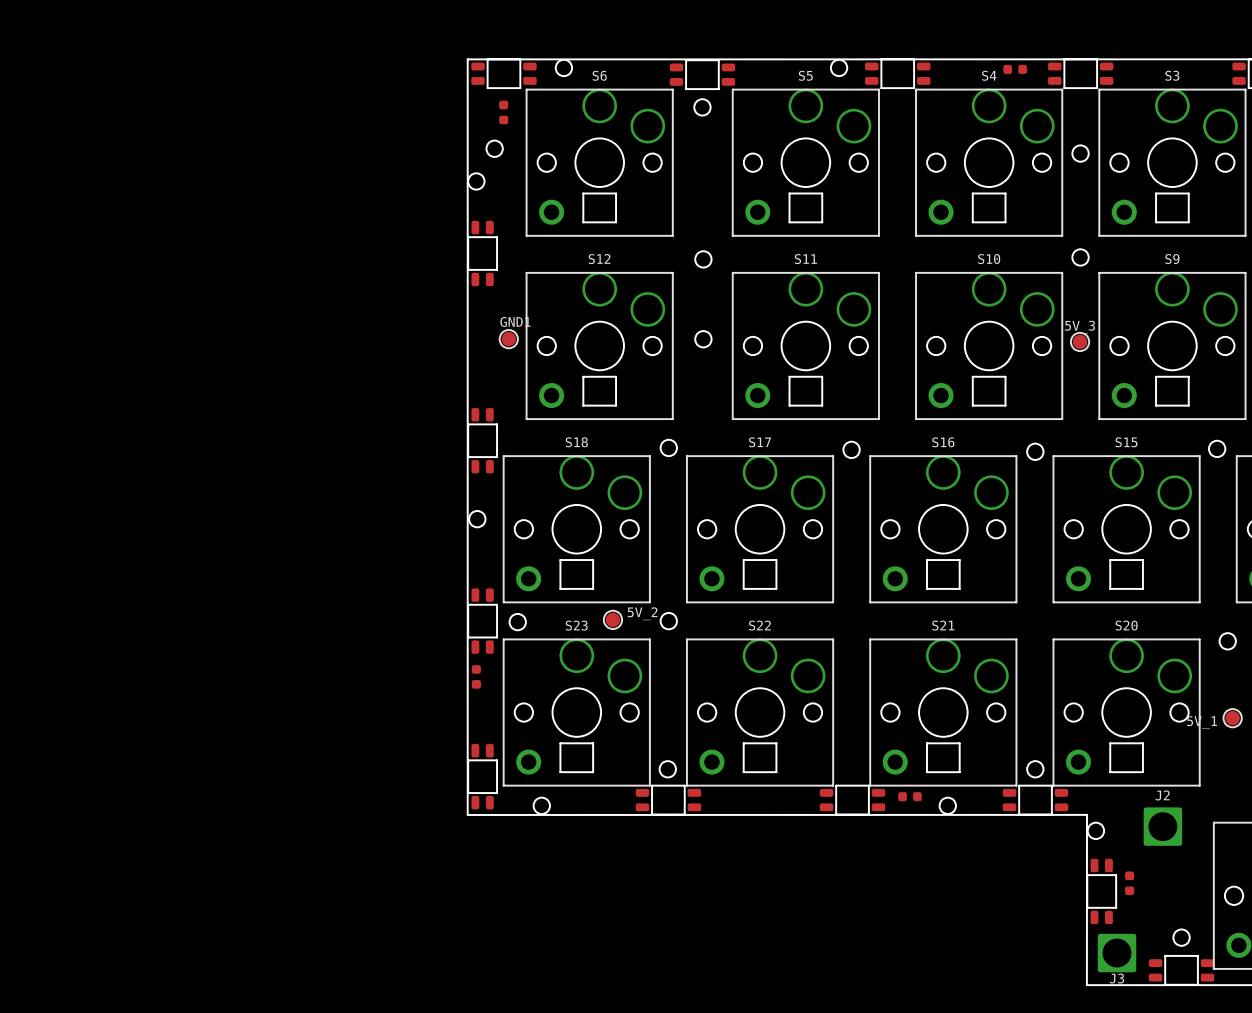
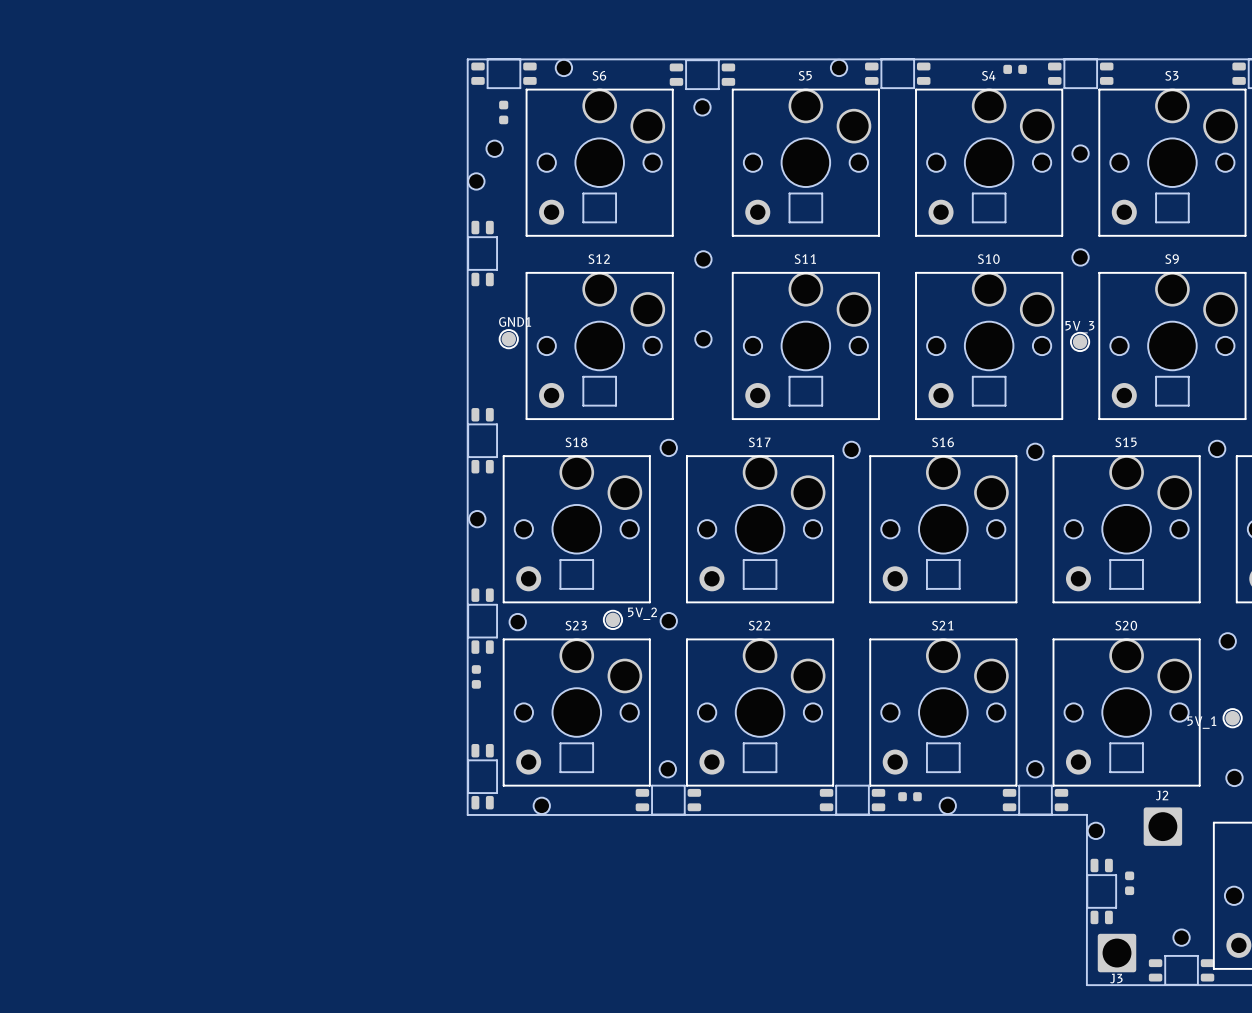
part: none -> (1234, 777)

